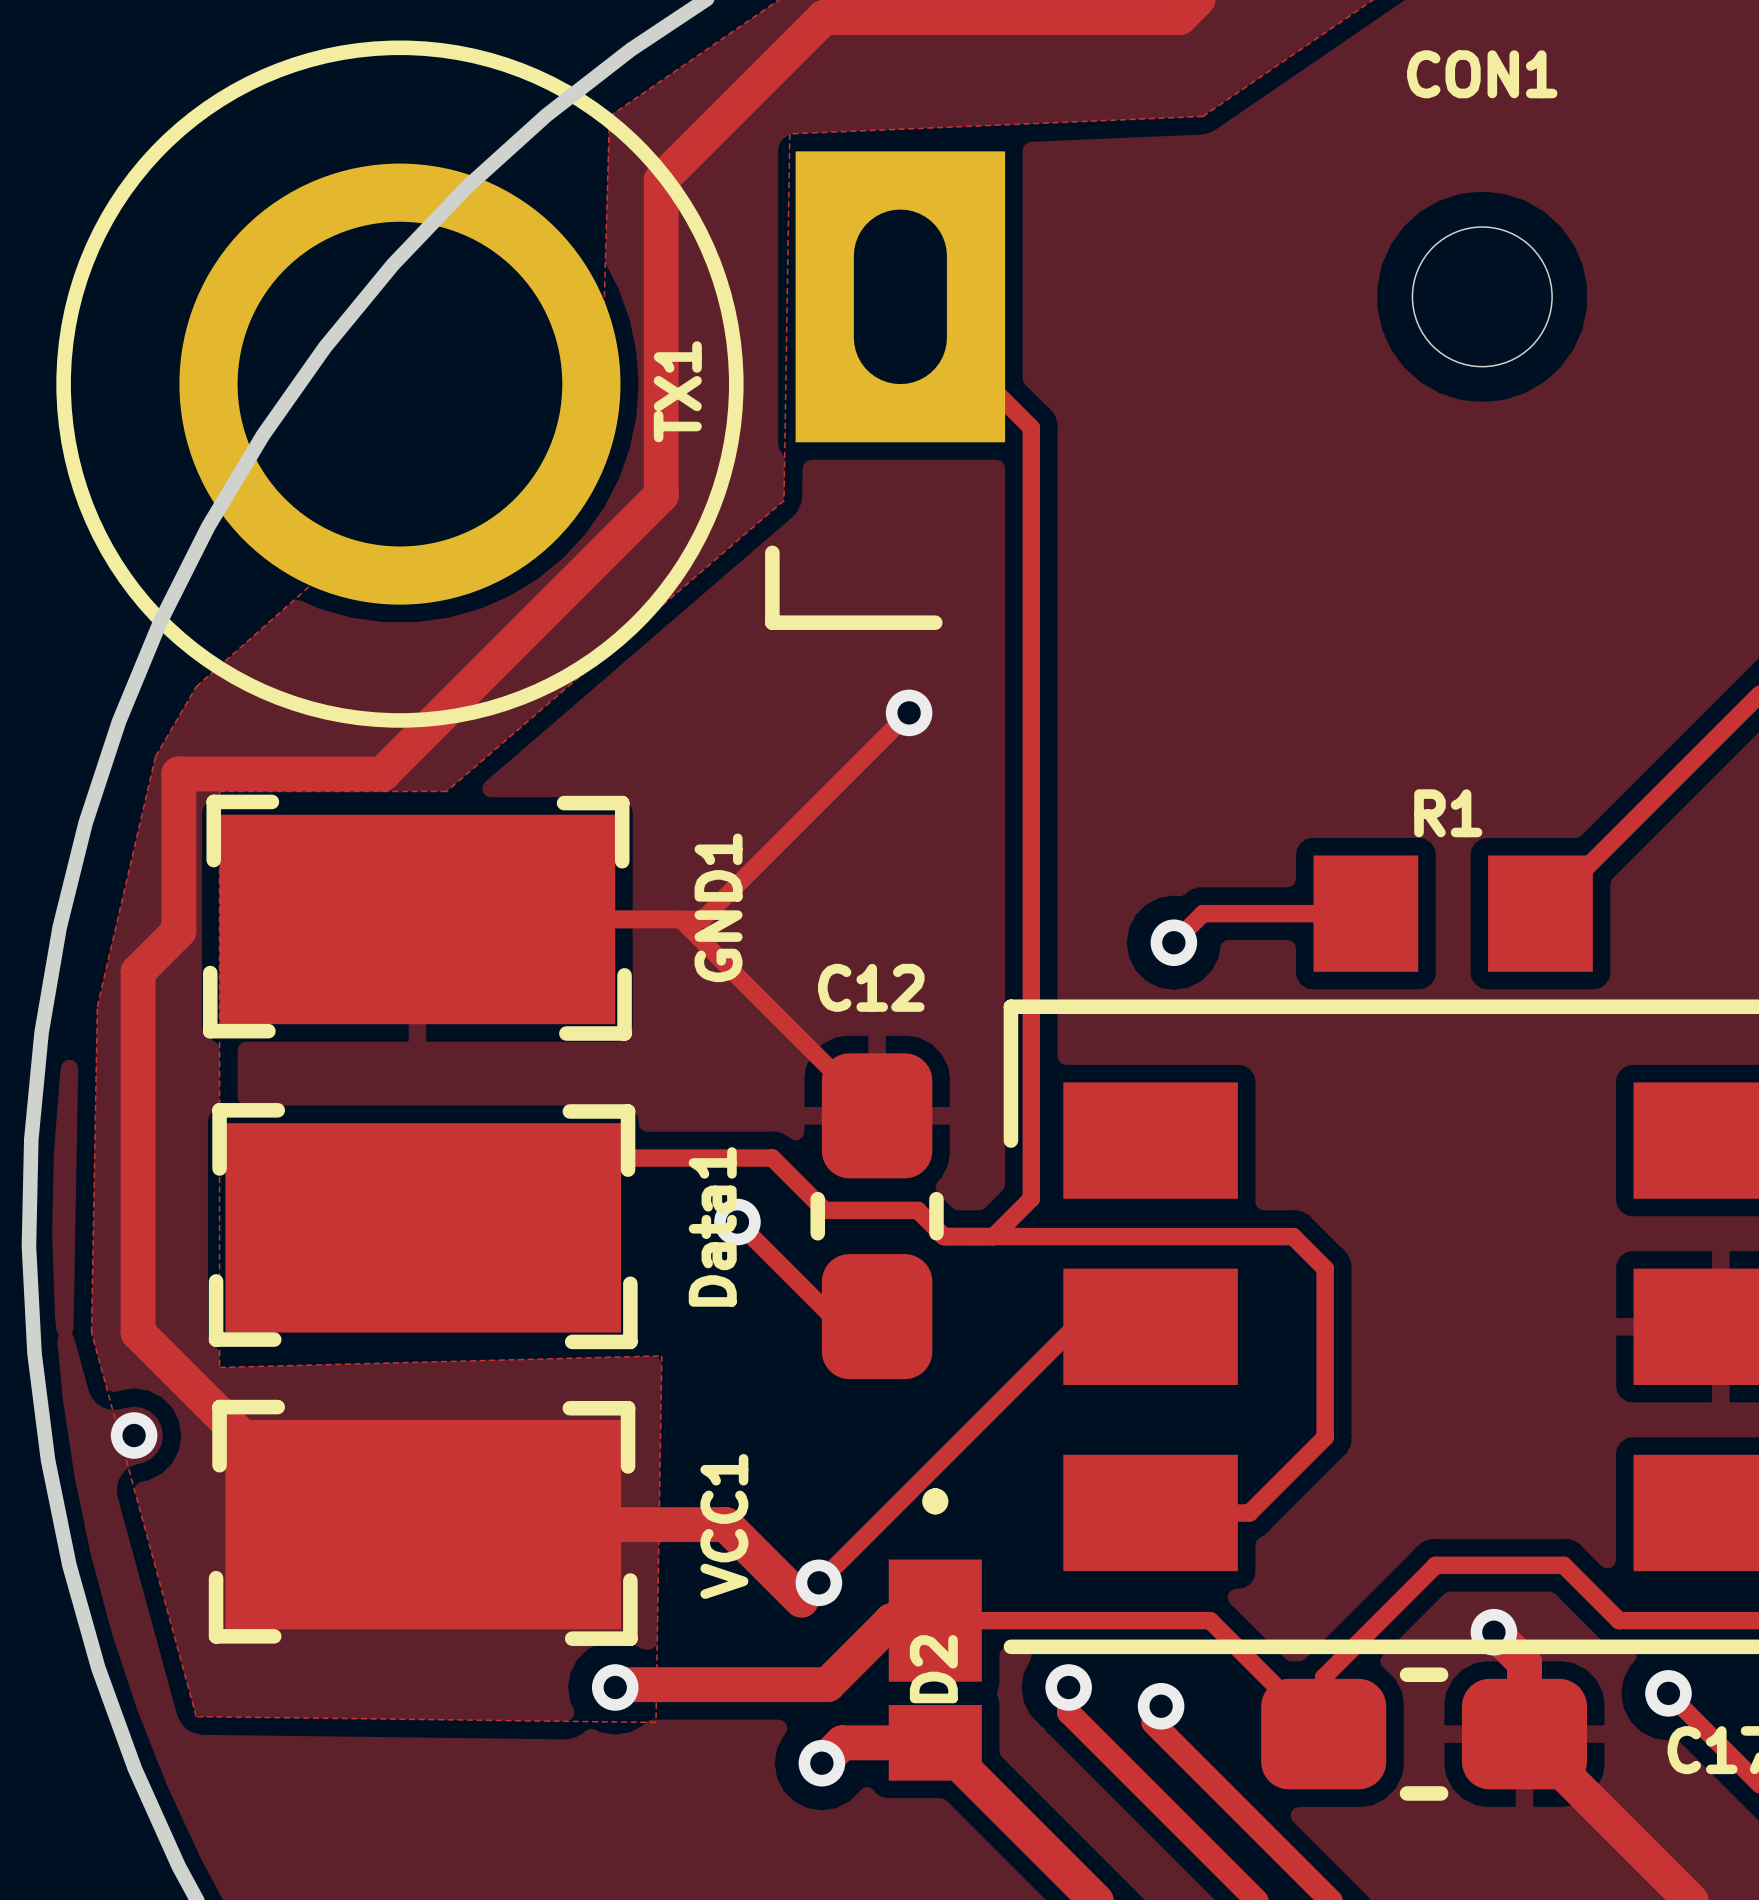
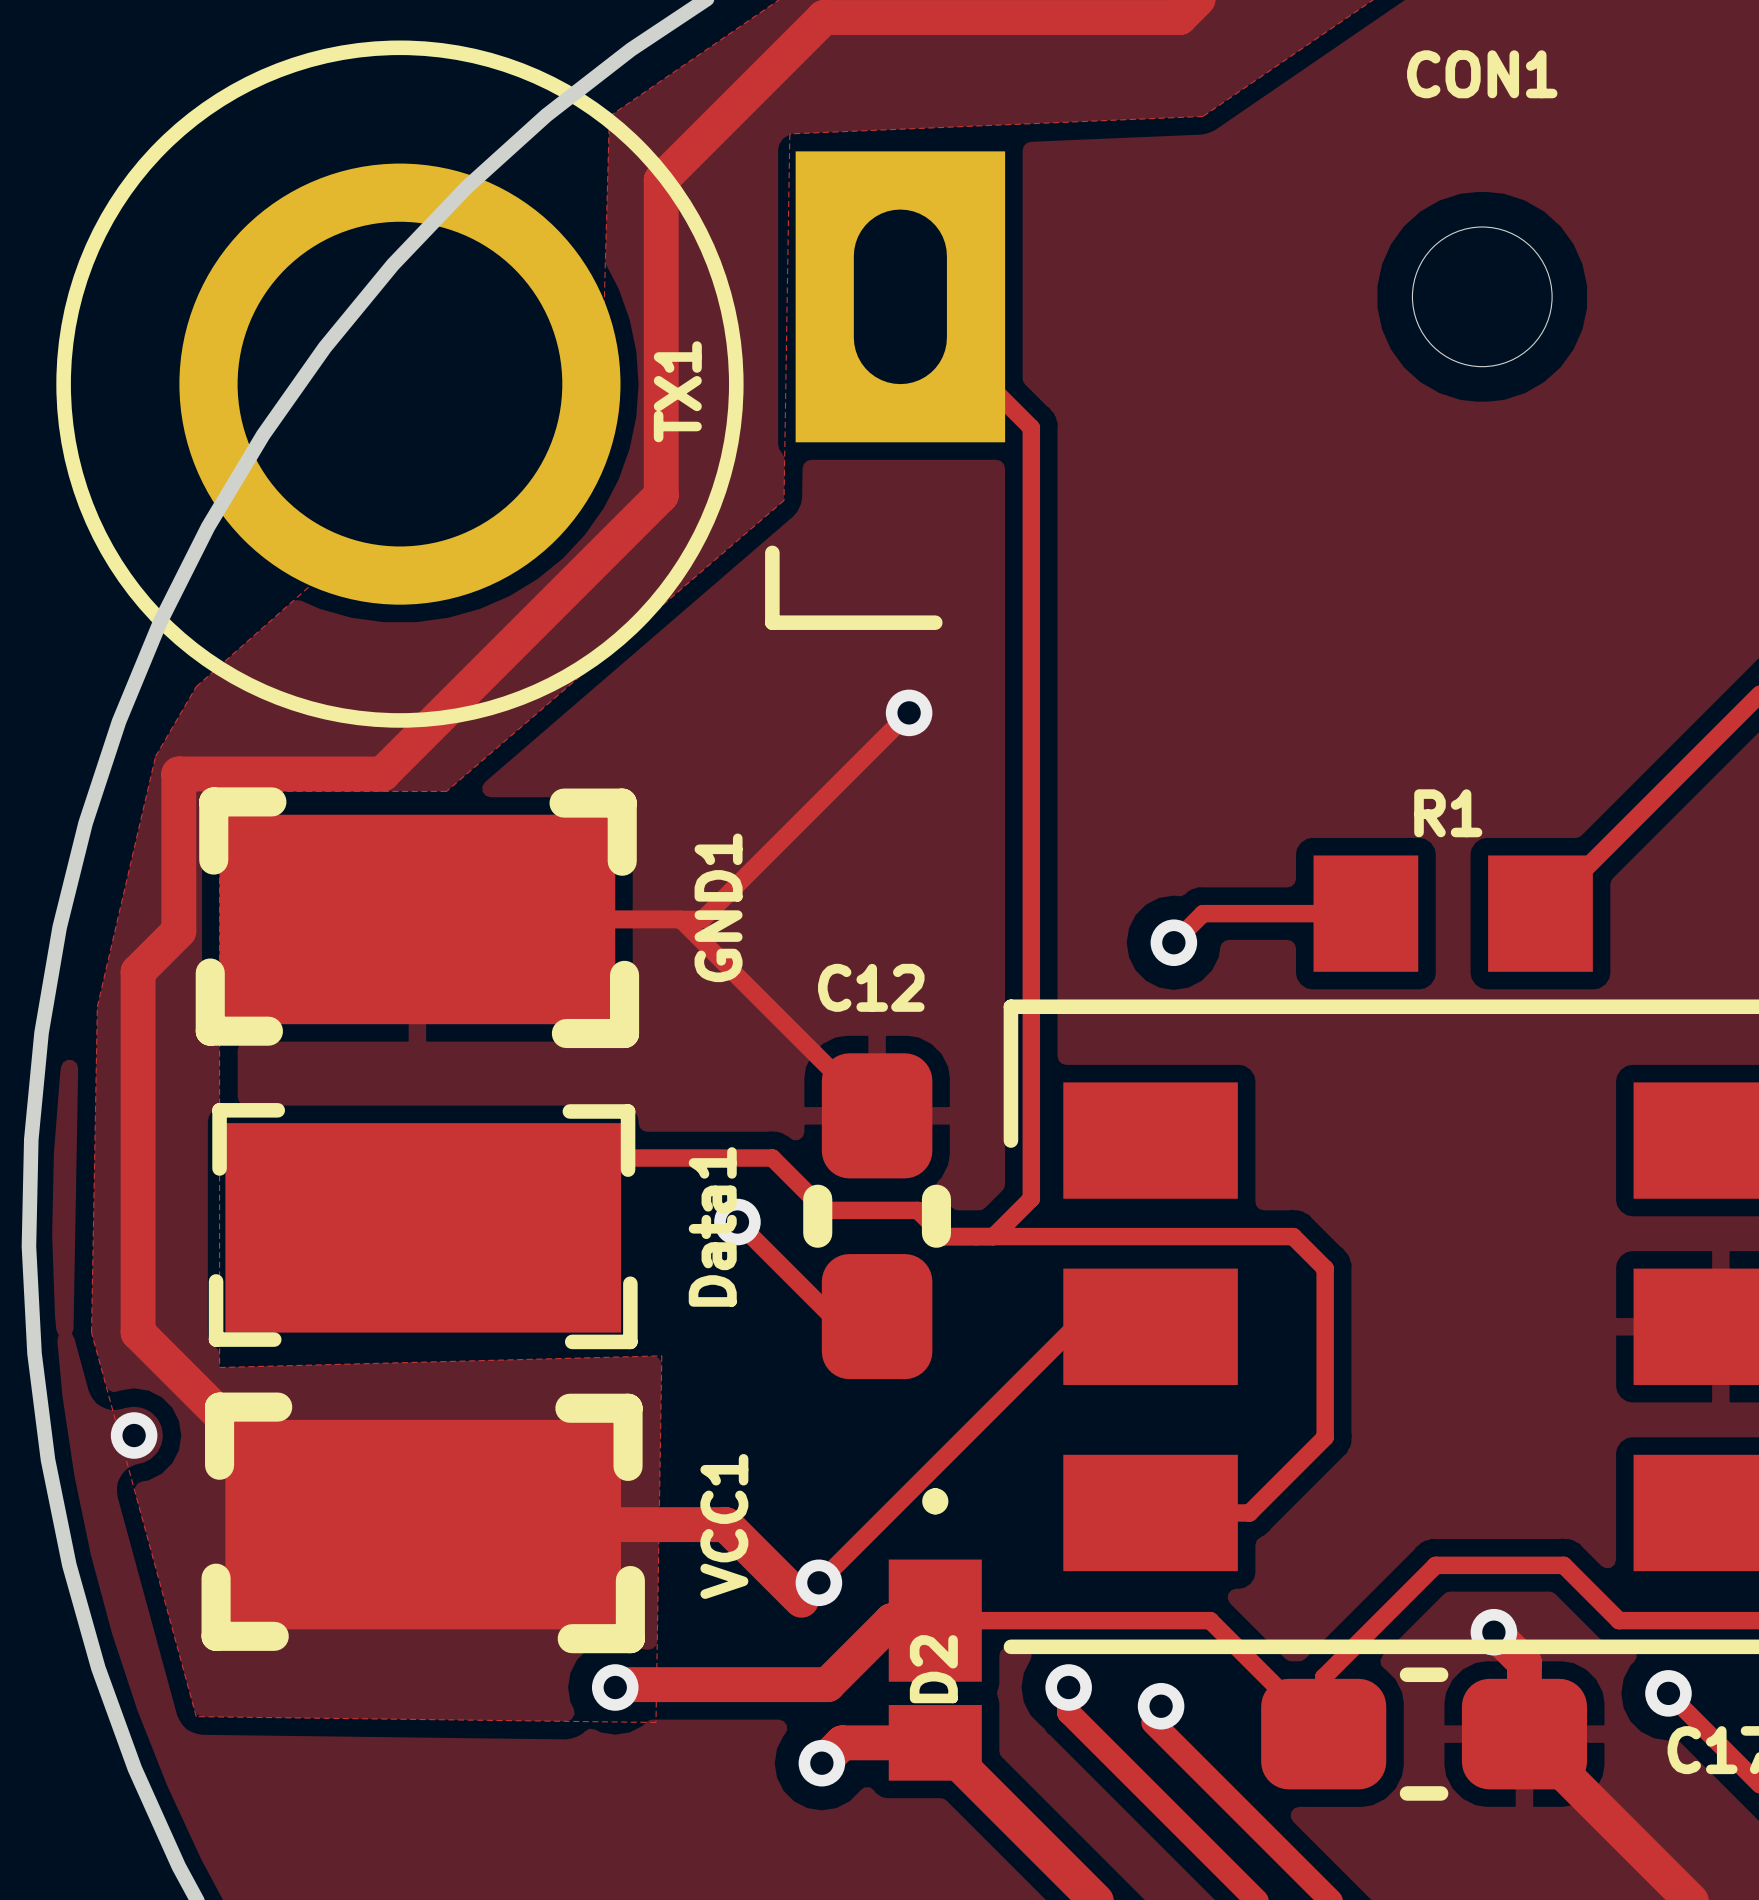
GND1 footprint: [202, 794, 632, 1041] -> [195, 787, 640, 1049]
C12 footprint: [810, 1053, 944, 1380] -> [803, 1053, 952, 1380]
VCC1 footprint: [208, 1399, 638, 1646] -> [201, 1392, 645, 1654]

